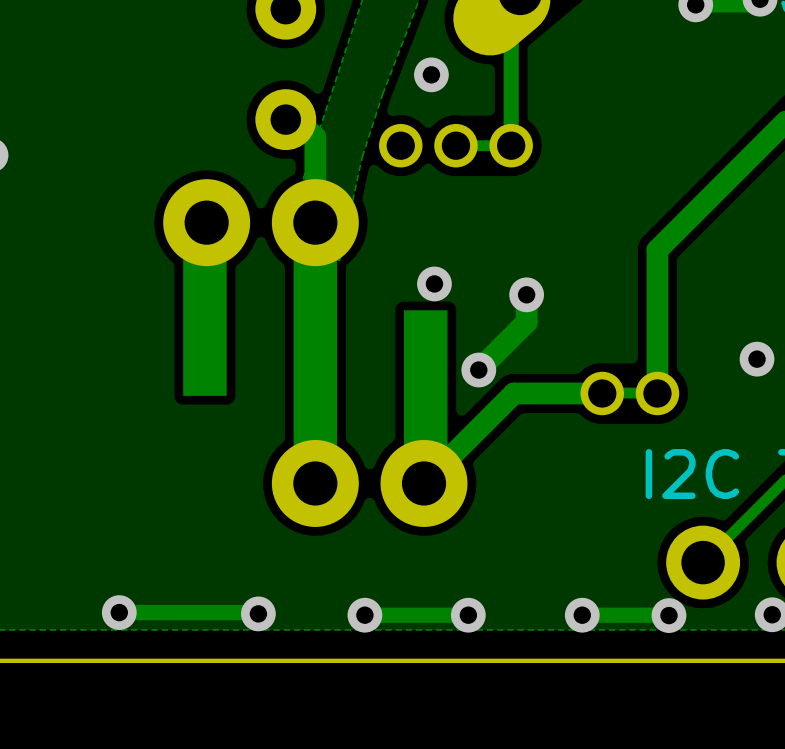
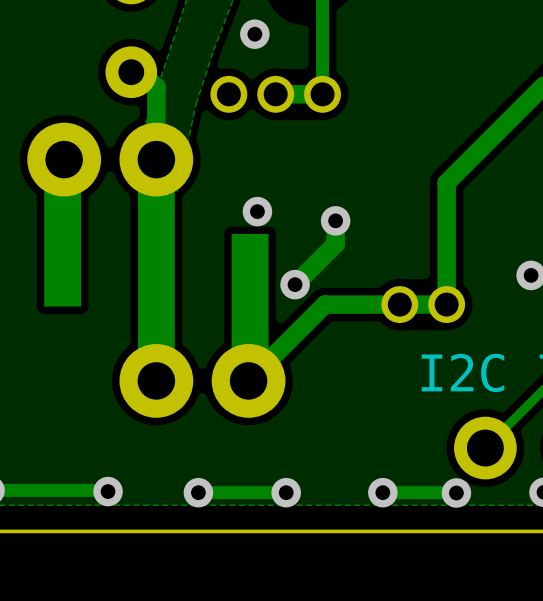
part footprint: [379, 123, 533, 168] -> [210, 75, 341, 113]
part footprint: [580, 371, 680, 416] -> [381, 286, 466, 324]

